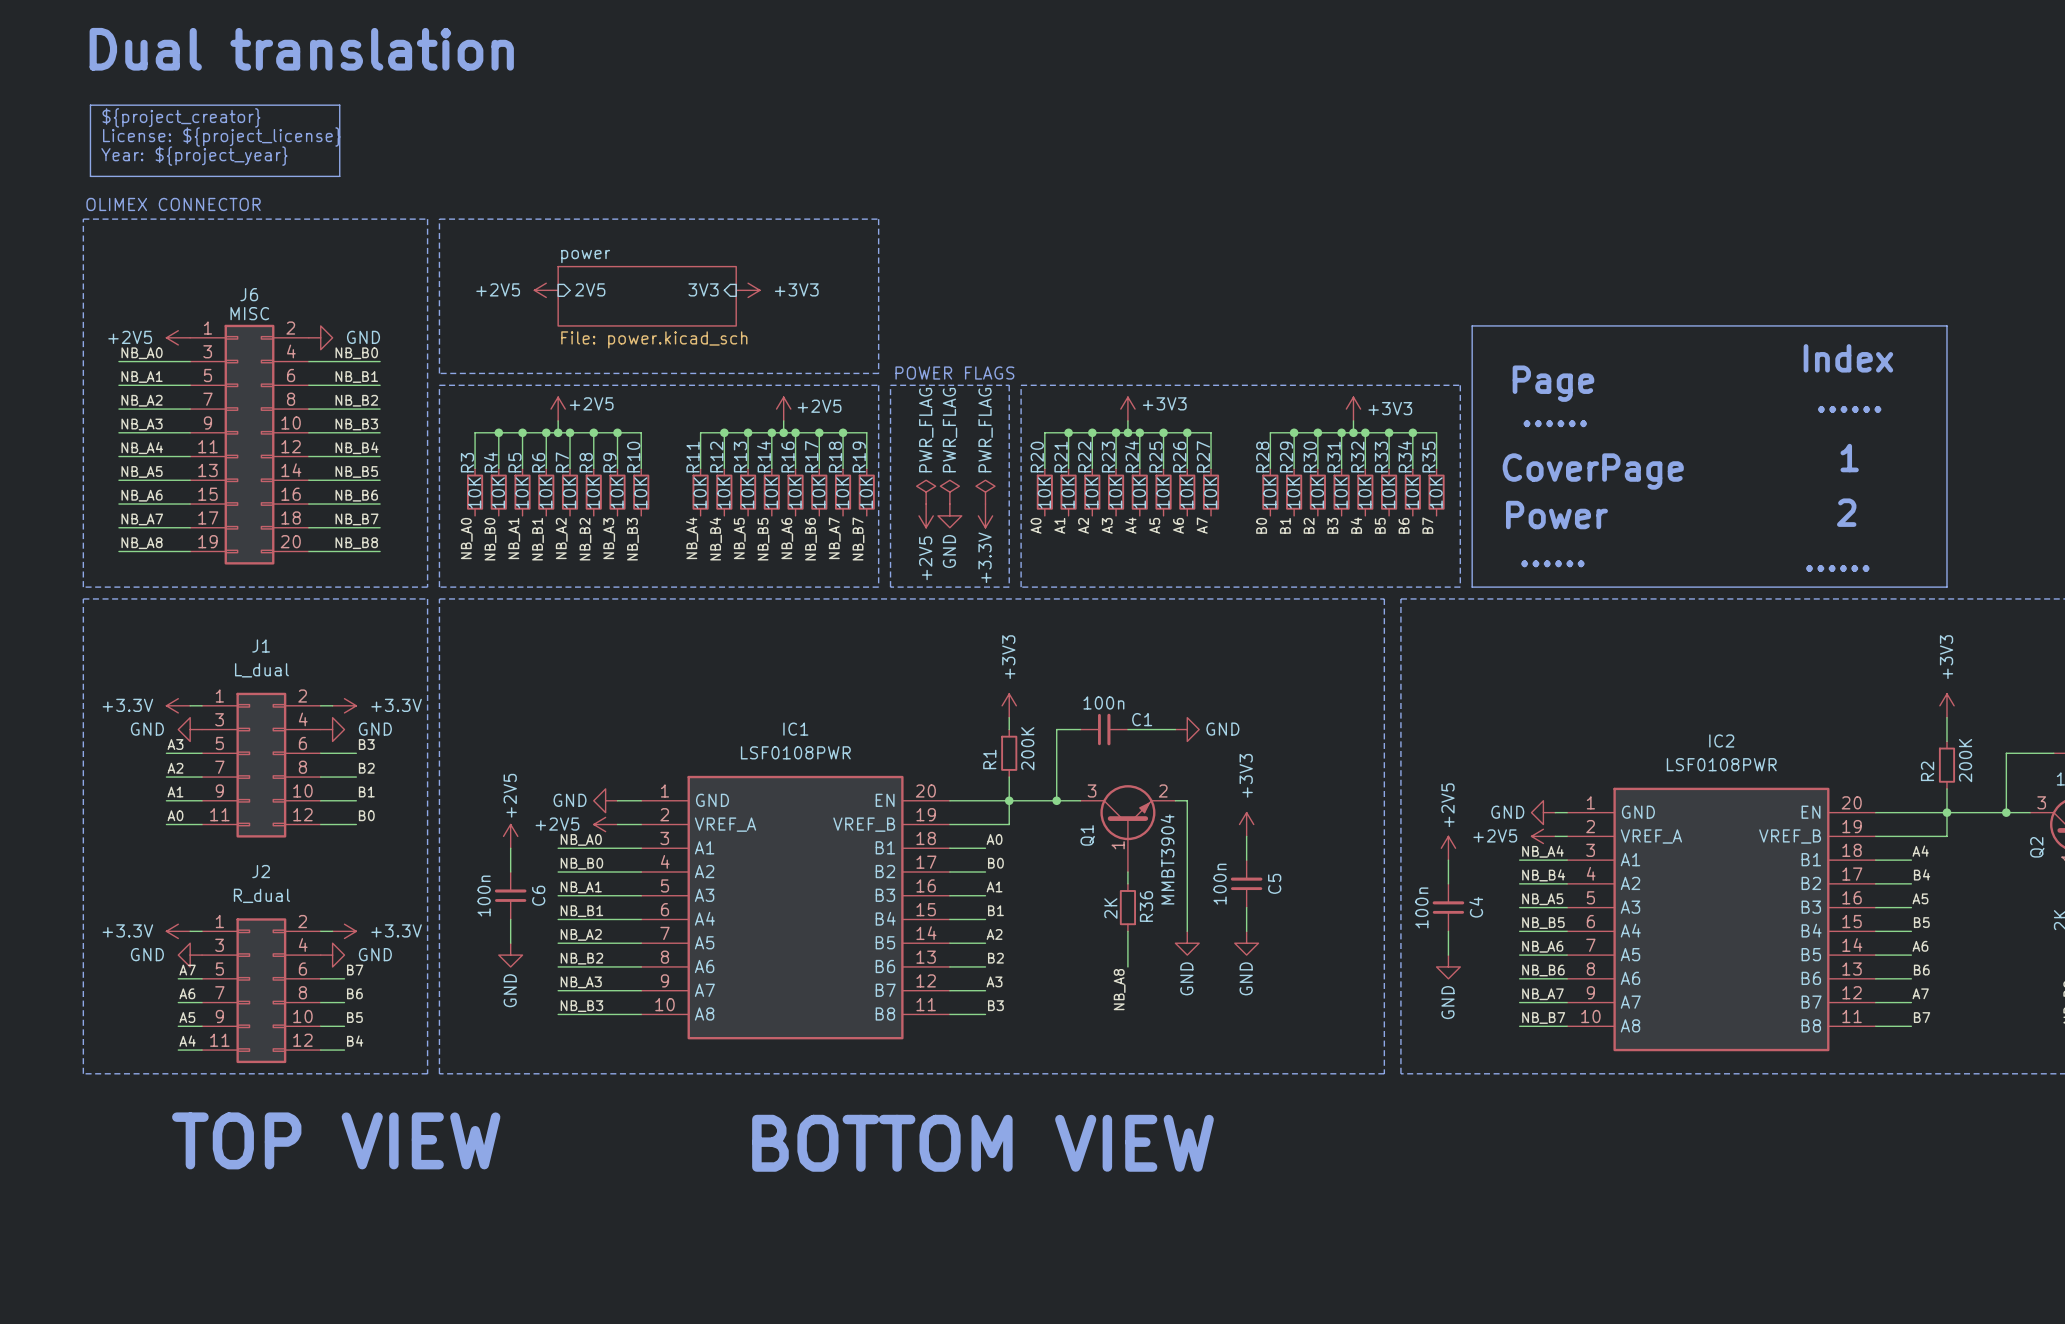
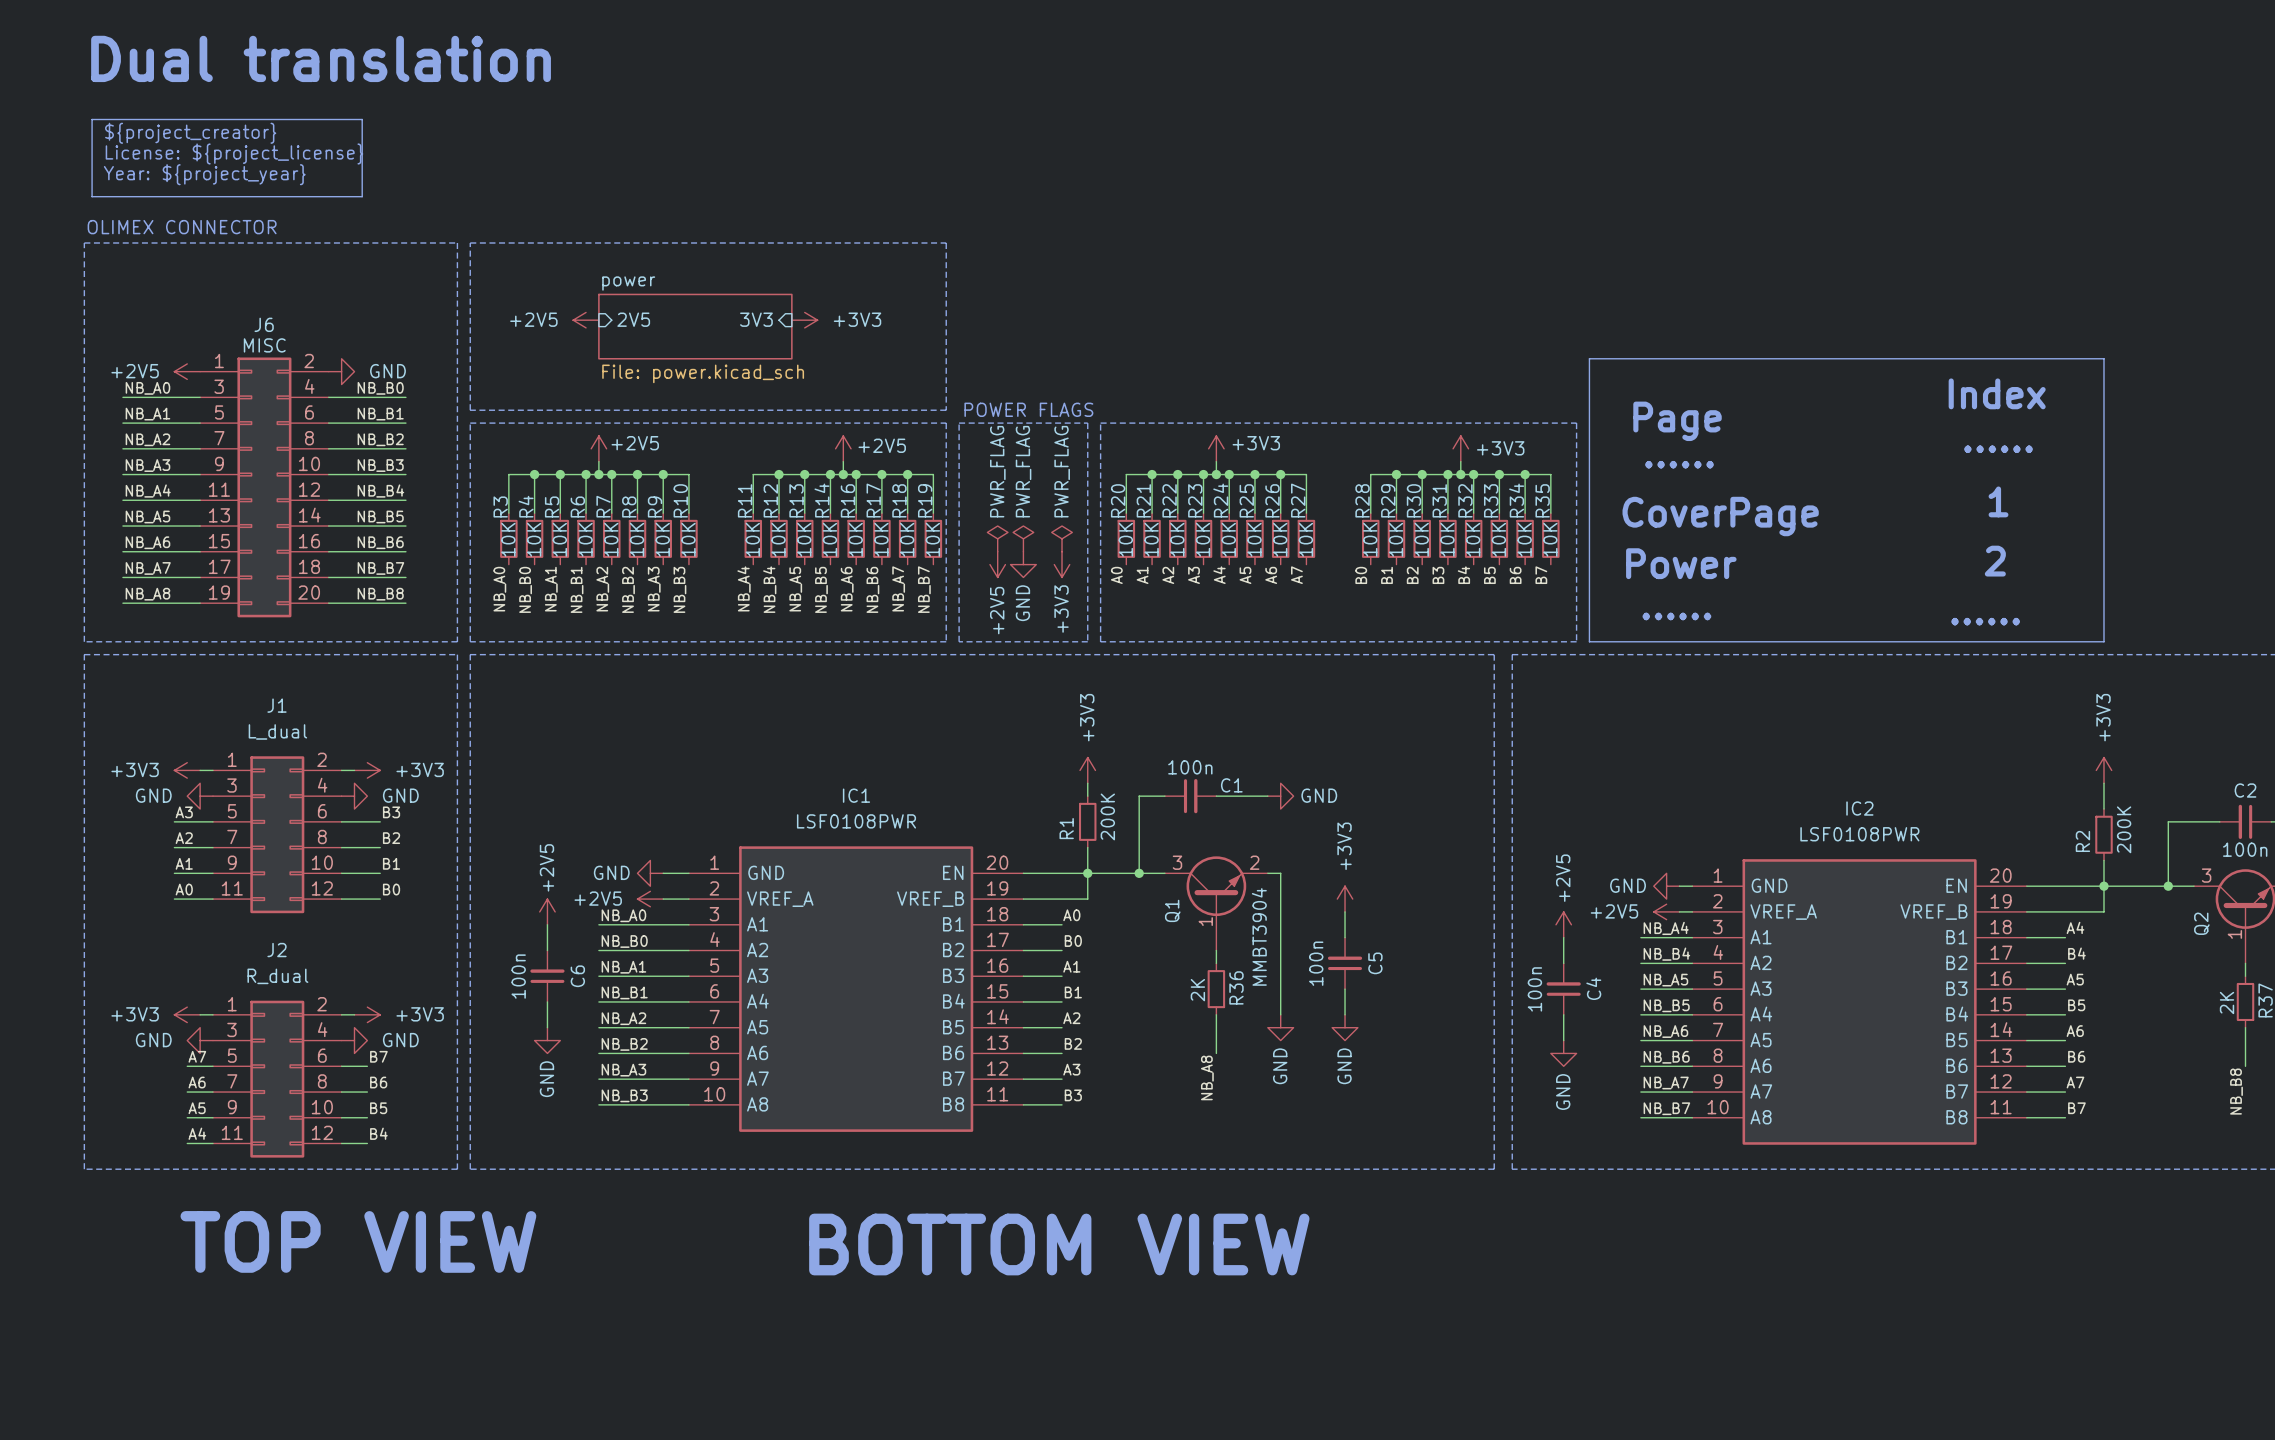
power symbol: +3.3V (985, 515) -> +3V3 (1062, 564)
power symbol: +3.3V (178, 705) -> +3V3 (187, 770)
power symbol: +3.3V (344, 705) -> +3V3 (367, 770)
power symbol: +3.3V (178, 931) -> +3V3 (187, 1014)
power symbol: +3.3V (344, 931) -> +3V3 (367, 1014)

